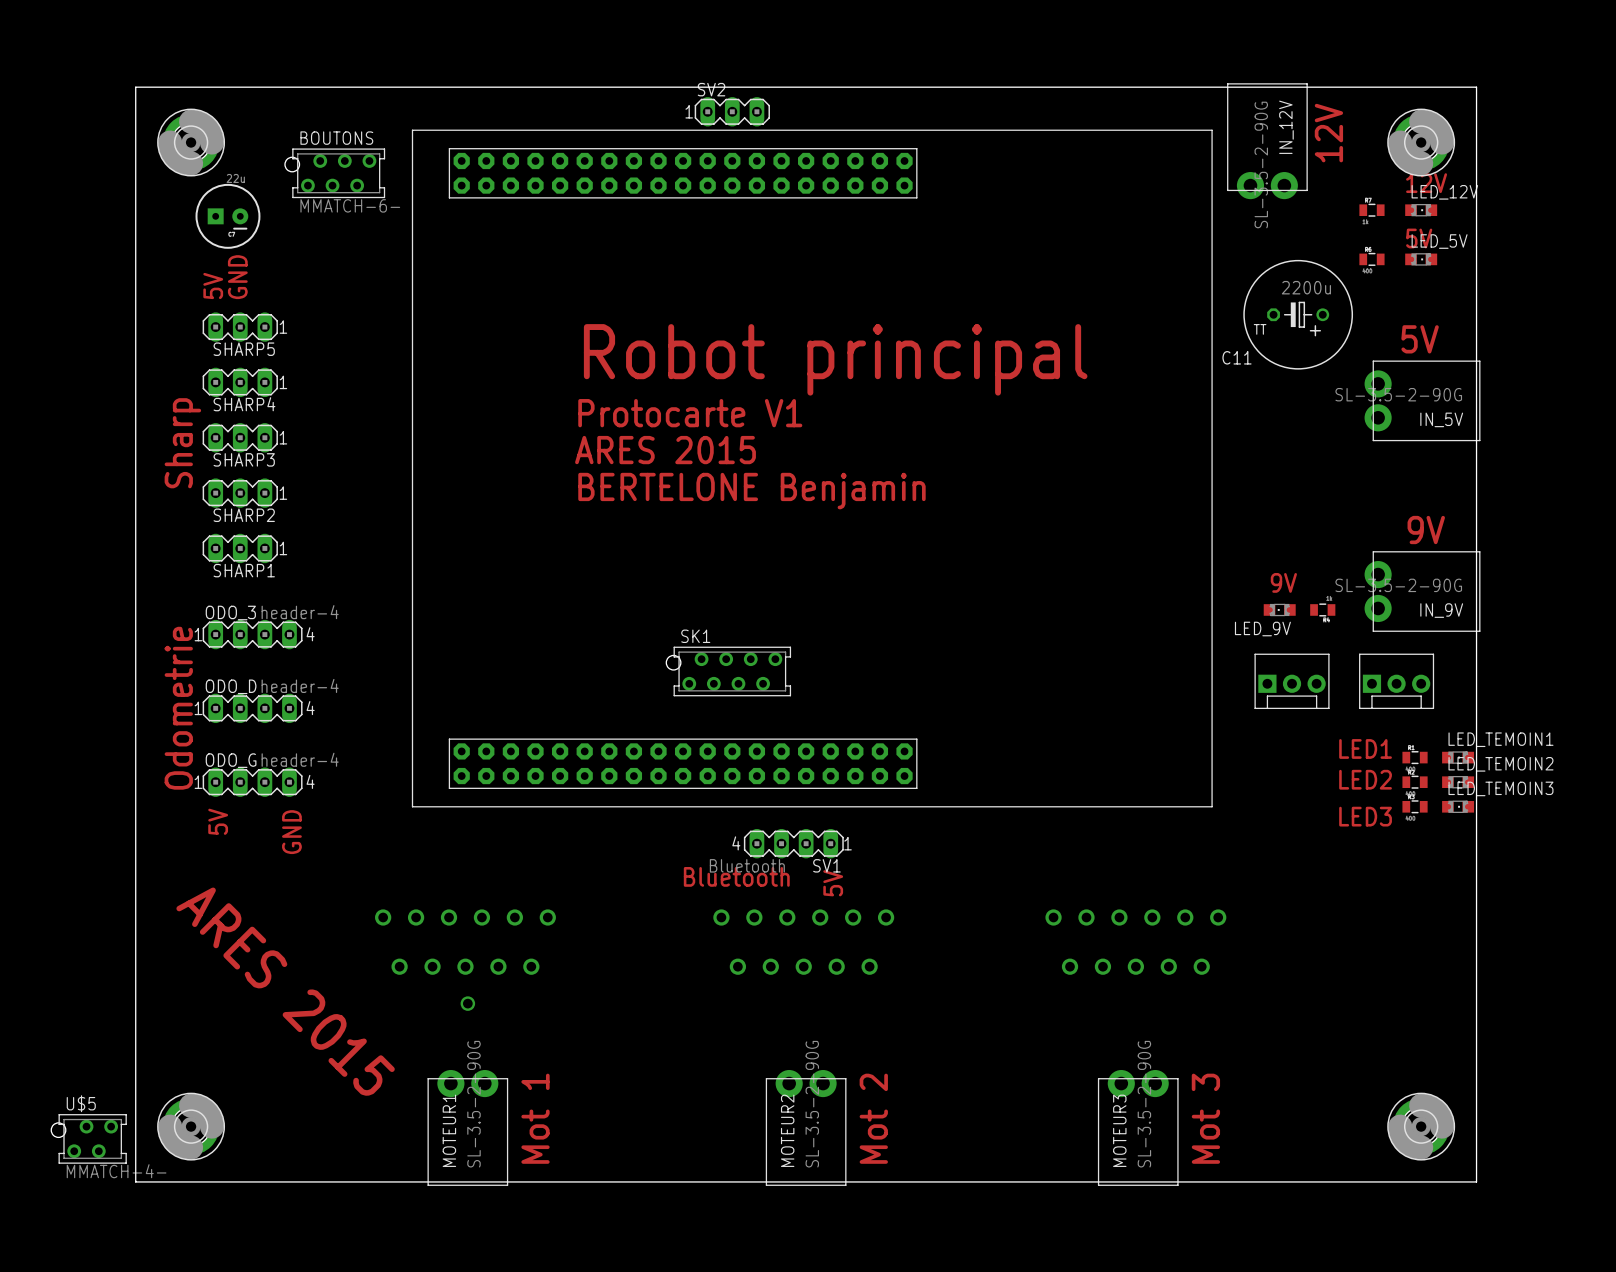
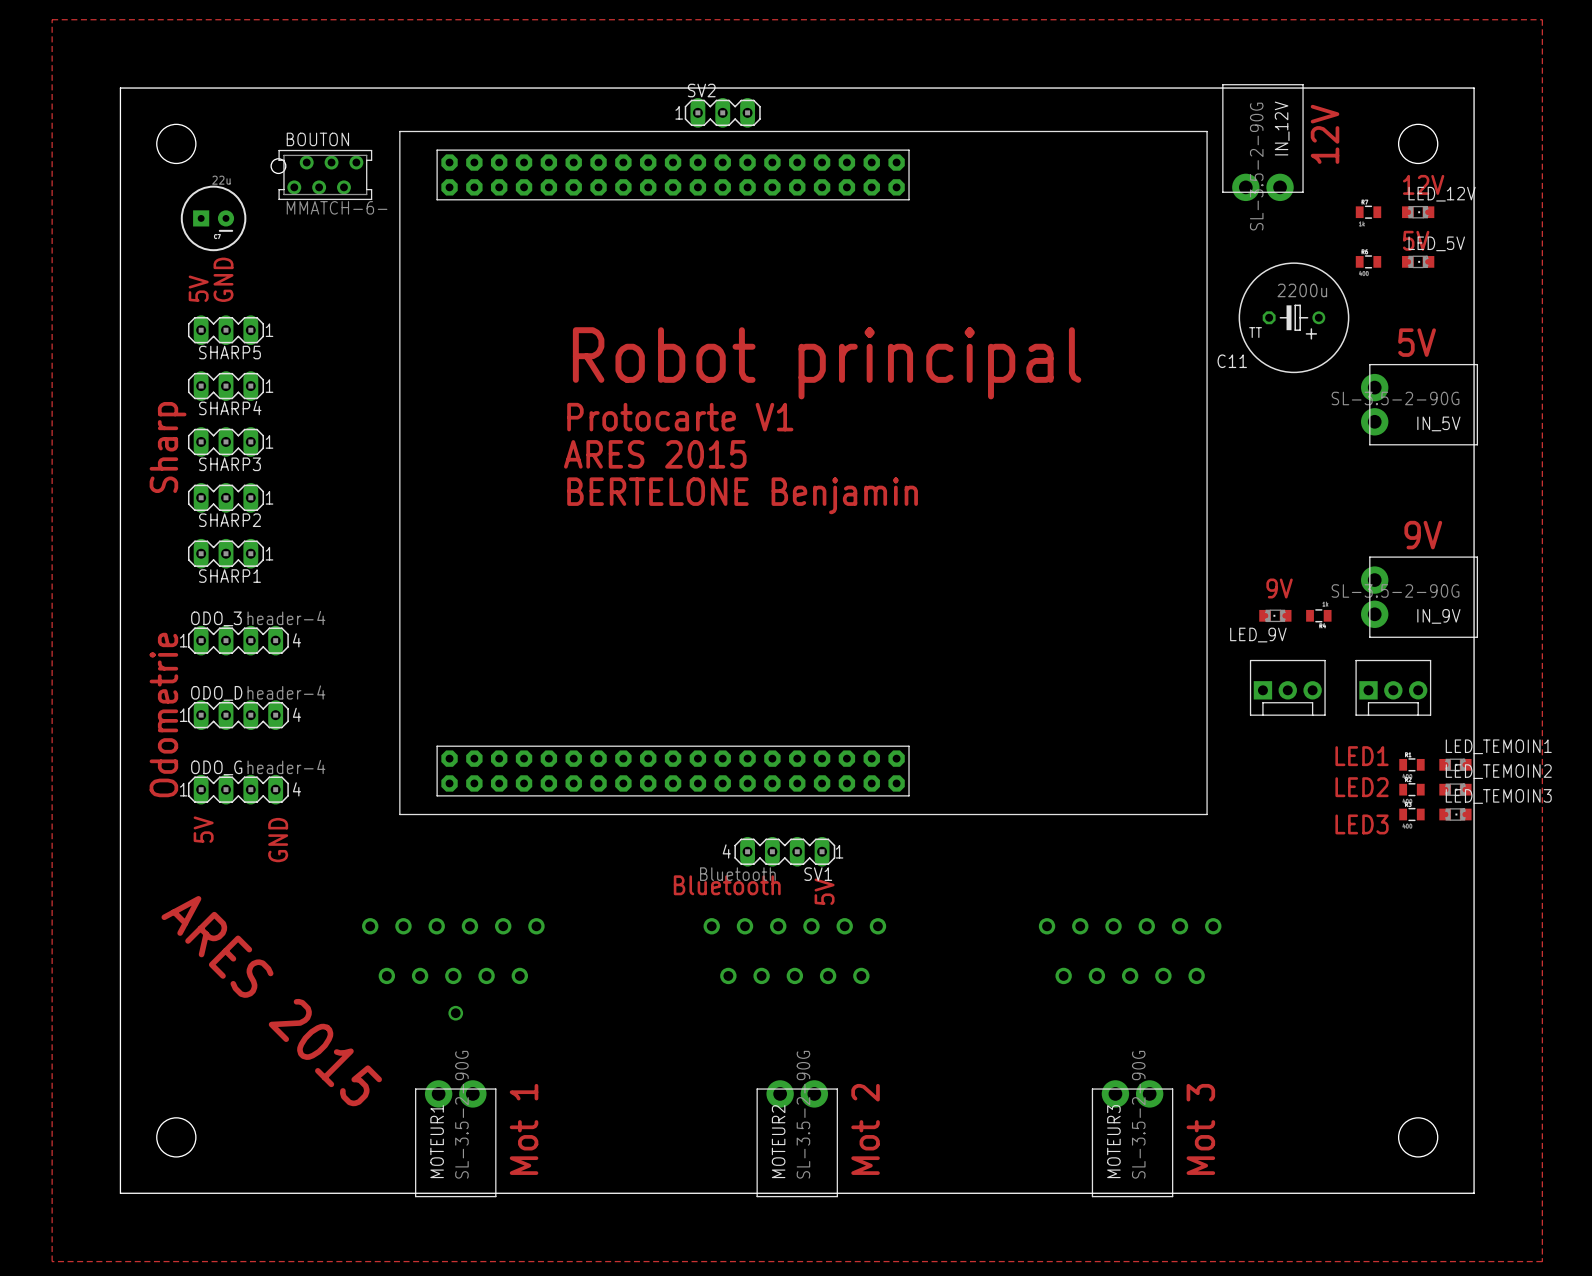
zone outline: none -> (52, 19) (1542, 19) (1542, 1261) (52, 1261) (52, 19)
BOUTONS name: BOUTONS (336, 138) -> BOUTON (317, 139)
part: (191, 142) -> none
part: (1421, 142) -> none
SK1: (728, 671) -> none
part: (191, 1126) -> none
part: (1421, 1126) -> none
U$5: MMATCH-4- (89, 1138) -> none

